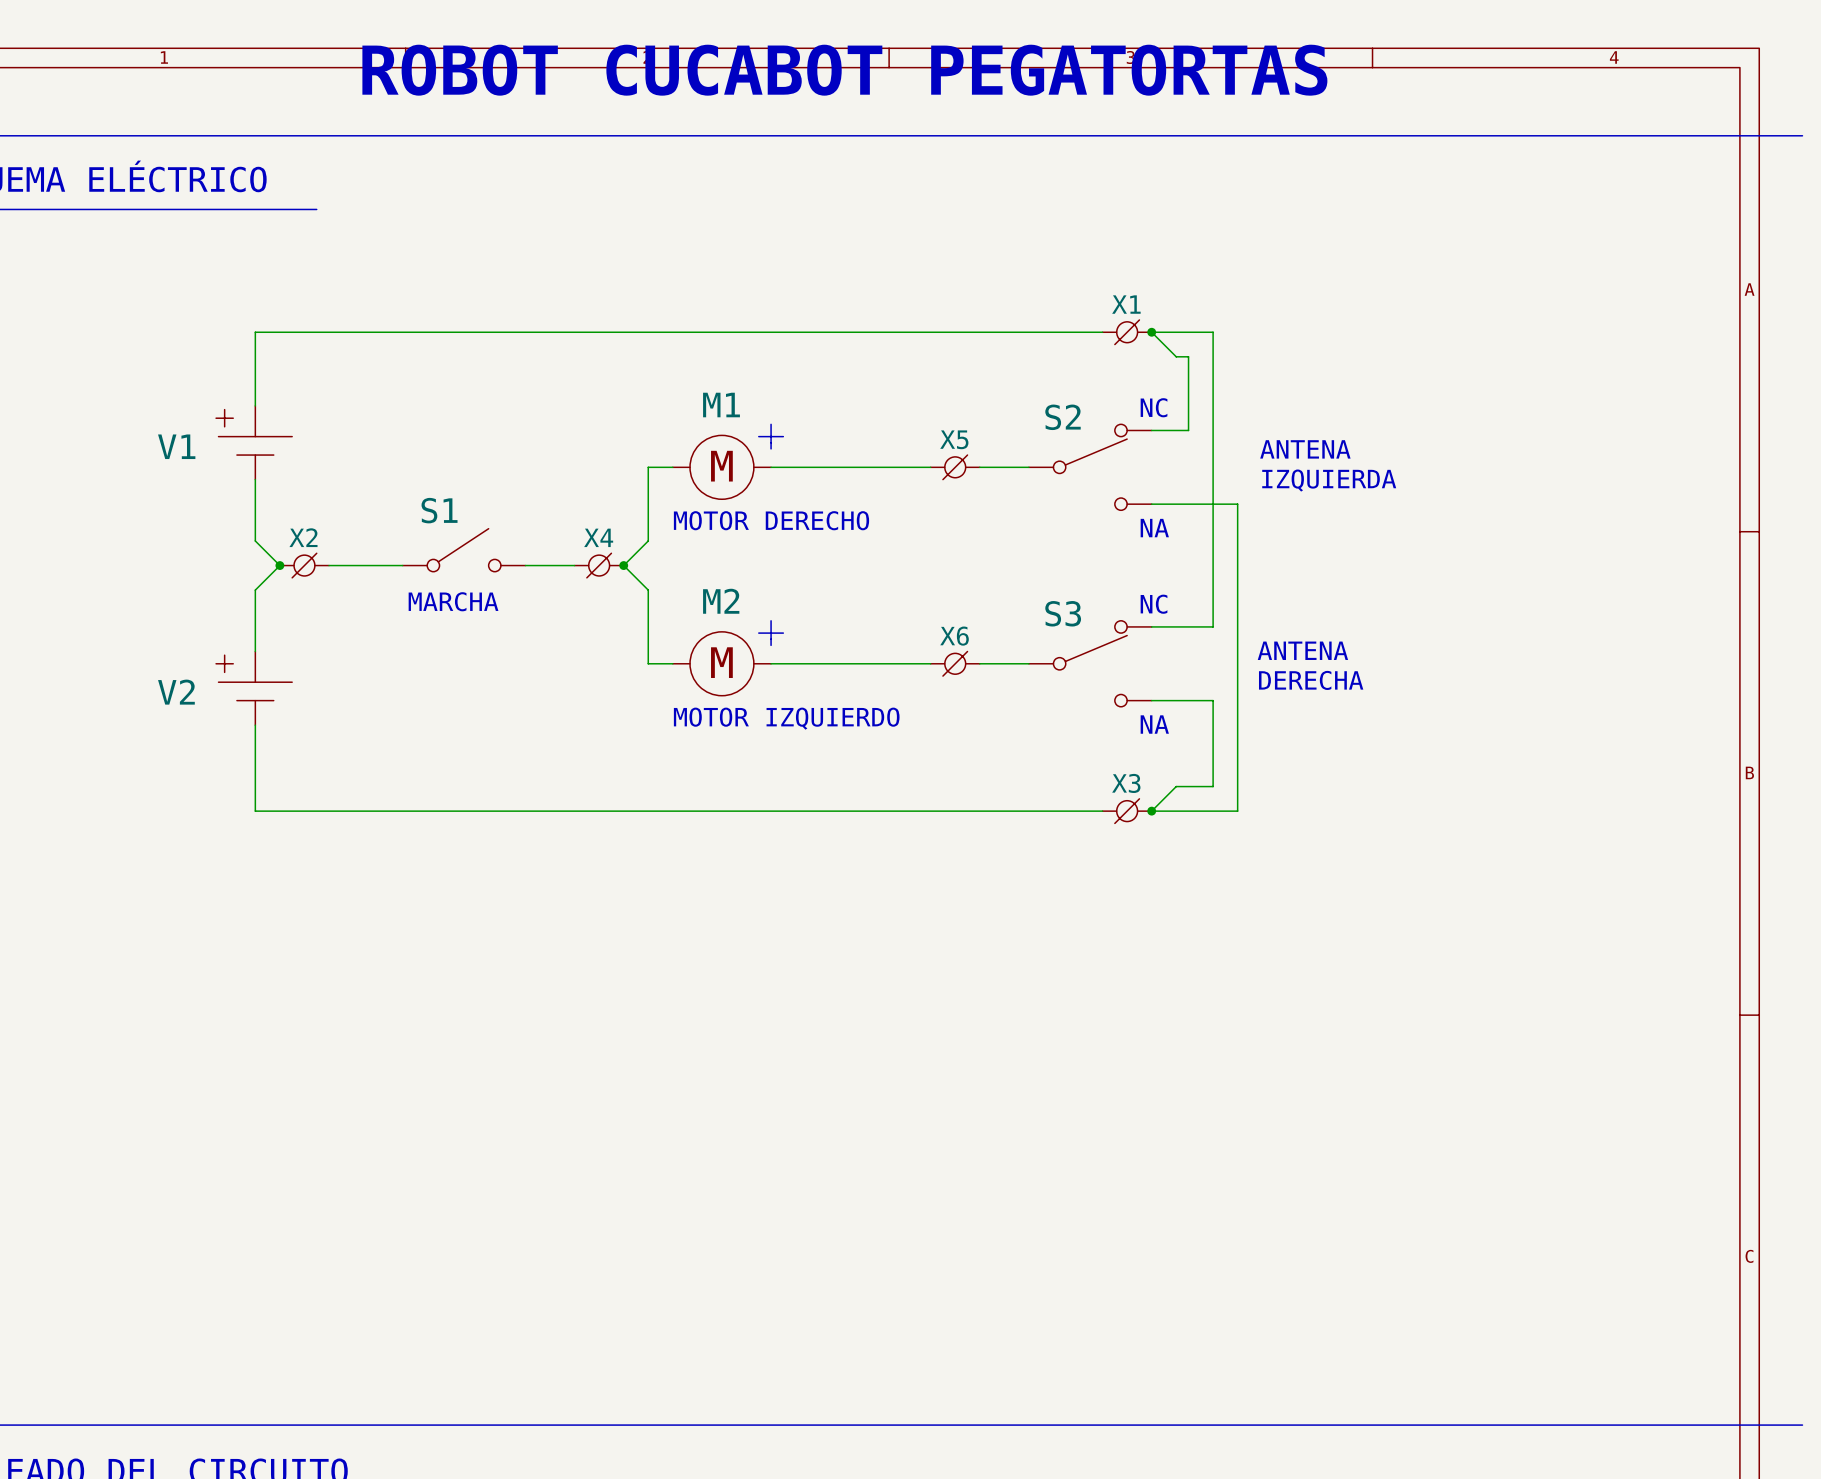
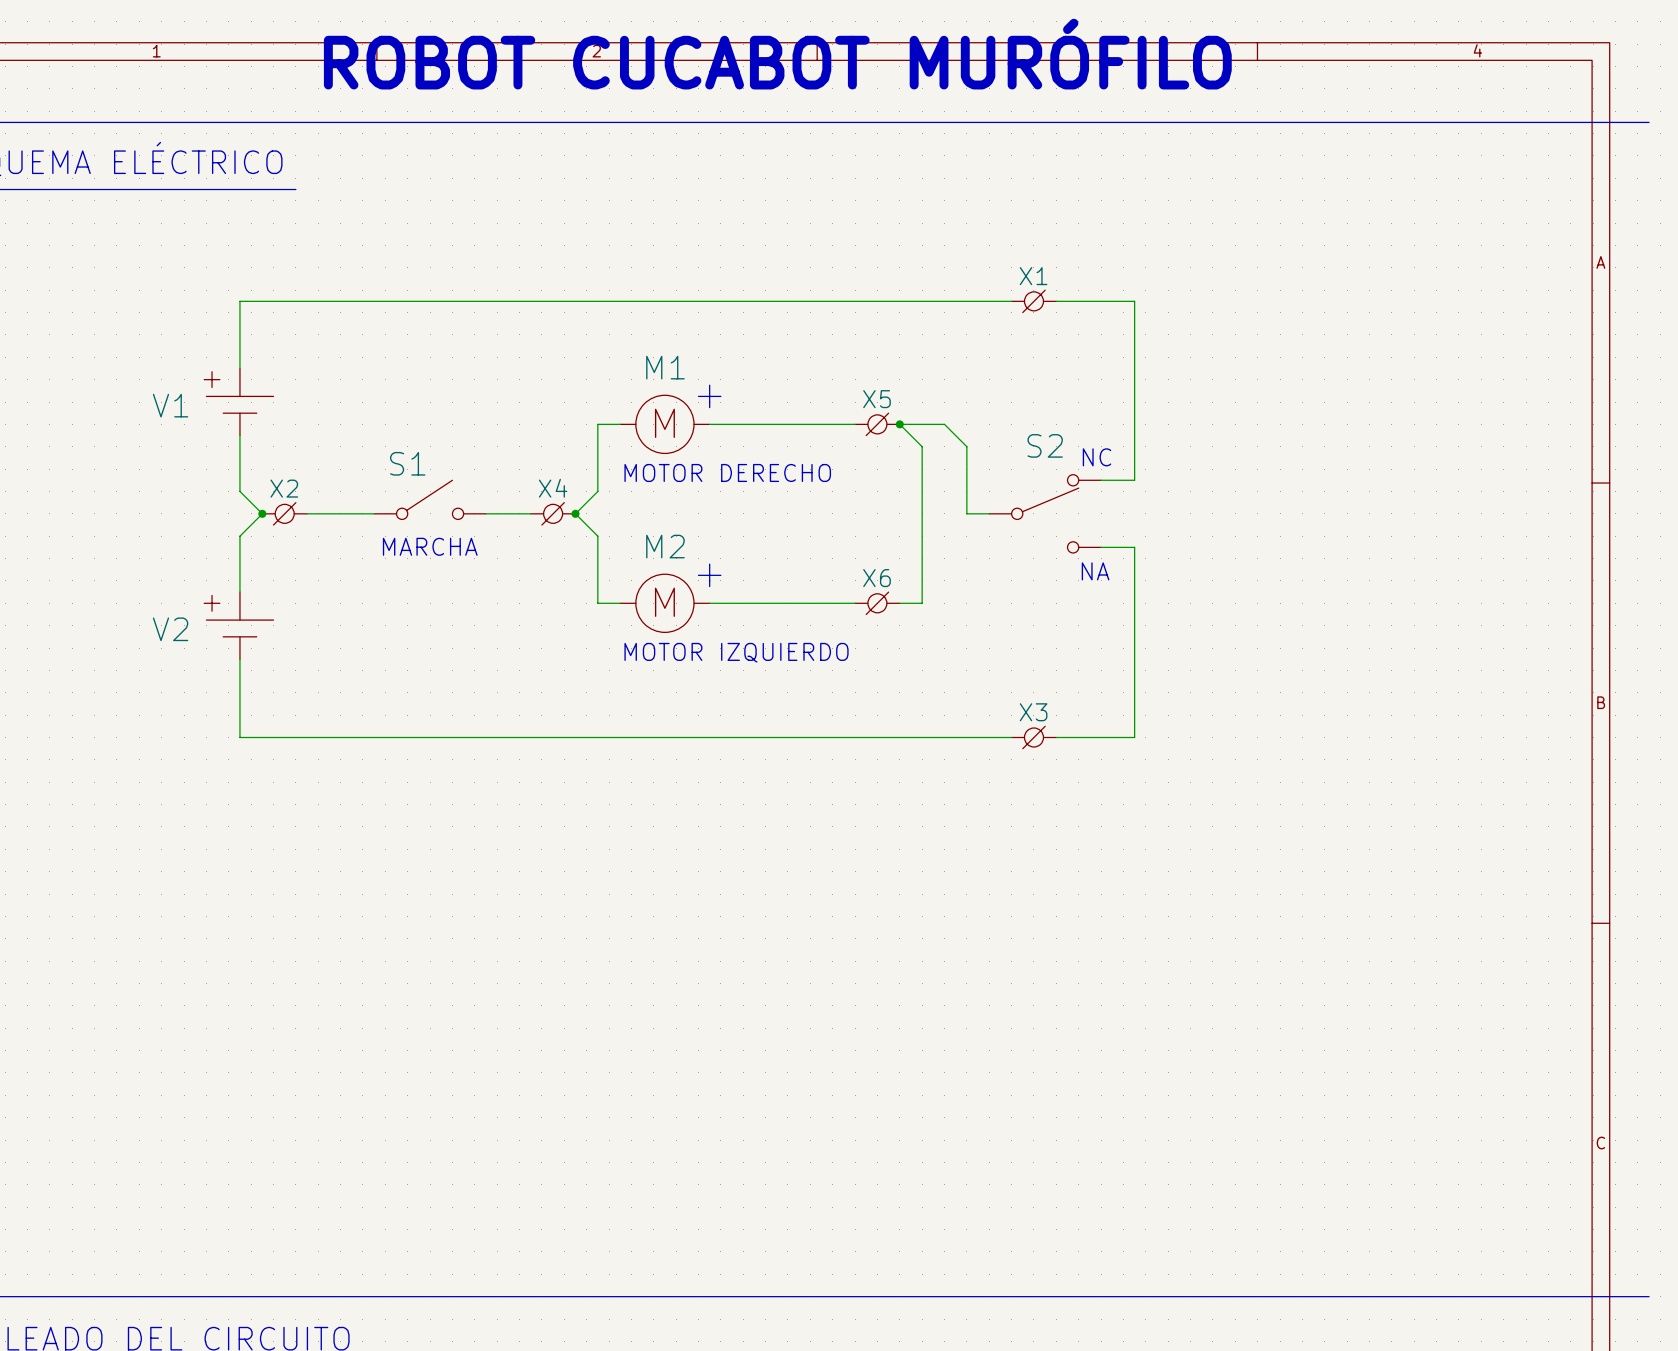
text: ROBOT CUCABOT PEGATORTAS (844, 70) -> ROBOT CUCABOT MURÓFILO (777, 54)
wire: (1151, 332) (1176, 356) (1188, 356) (1188, 430) (1151, 430) -> none
junction: (1151, 332) -> none
wire: (1213, 332) (1213, 626) (1151, 626) -> (1112, 301) (1134, 301) (1134, 457)
text: NC (1154, 407) -> none
S2 name position: S2 (1063, 417) -> S2 (1045, 445)
text: ANTENA (1305, 449) -> none
junction: none -> (899, 424)
wire: none -> (944, 424) (966, 446) (966, 513) (989, 513)
S2 position: (1090, 467) -> (1045, 513)
text: IZQUIERDA (1329, 480) -> none
text: none -> NC (1097, 457)
wire: (1151, 504) (1237, 504) -> none
text: NA (1154, 528) -> none
wire: (1237, 528) (1237, 602) -> (1134, 480) (1101, 480)
wire: none -> (1101, 547) (1134, 547)
text: NC (1154, 604) -> none
text: none -> NA (1095, 571)
text: ANTENA (1302, 650) -> none
wire: (1004, 663) (1028, 663) -> (922, 603) (922, 446) (899, 424)
S3: (1090, 663) -> none
text: DERECHA (1311, 680) -> none
wire: (1151, 700) (1213, 700) (1213, 786) (1176, 786) (1151, 811) -> none
text: NA (1154, 724) -> none
junction: (1151, 811) -> none

